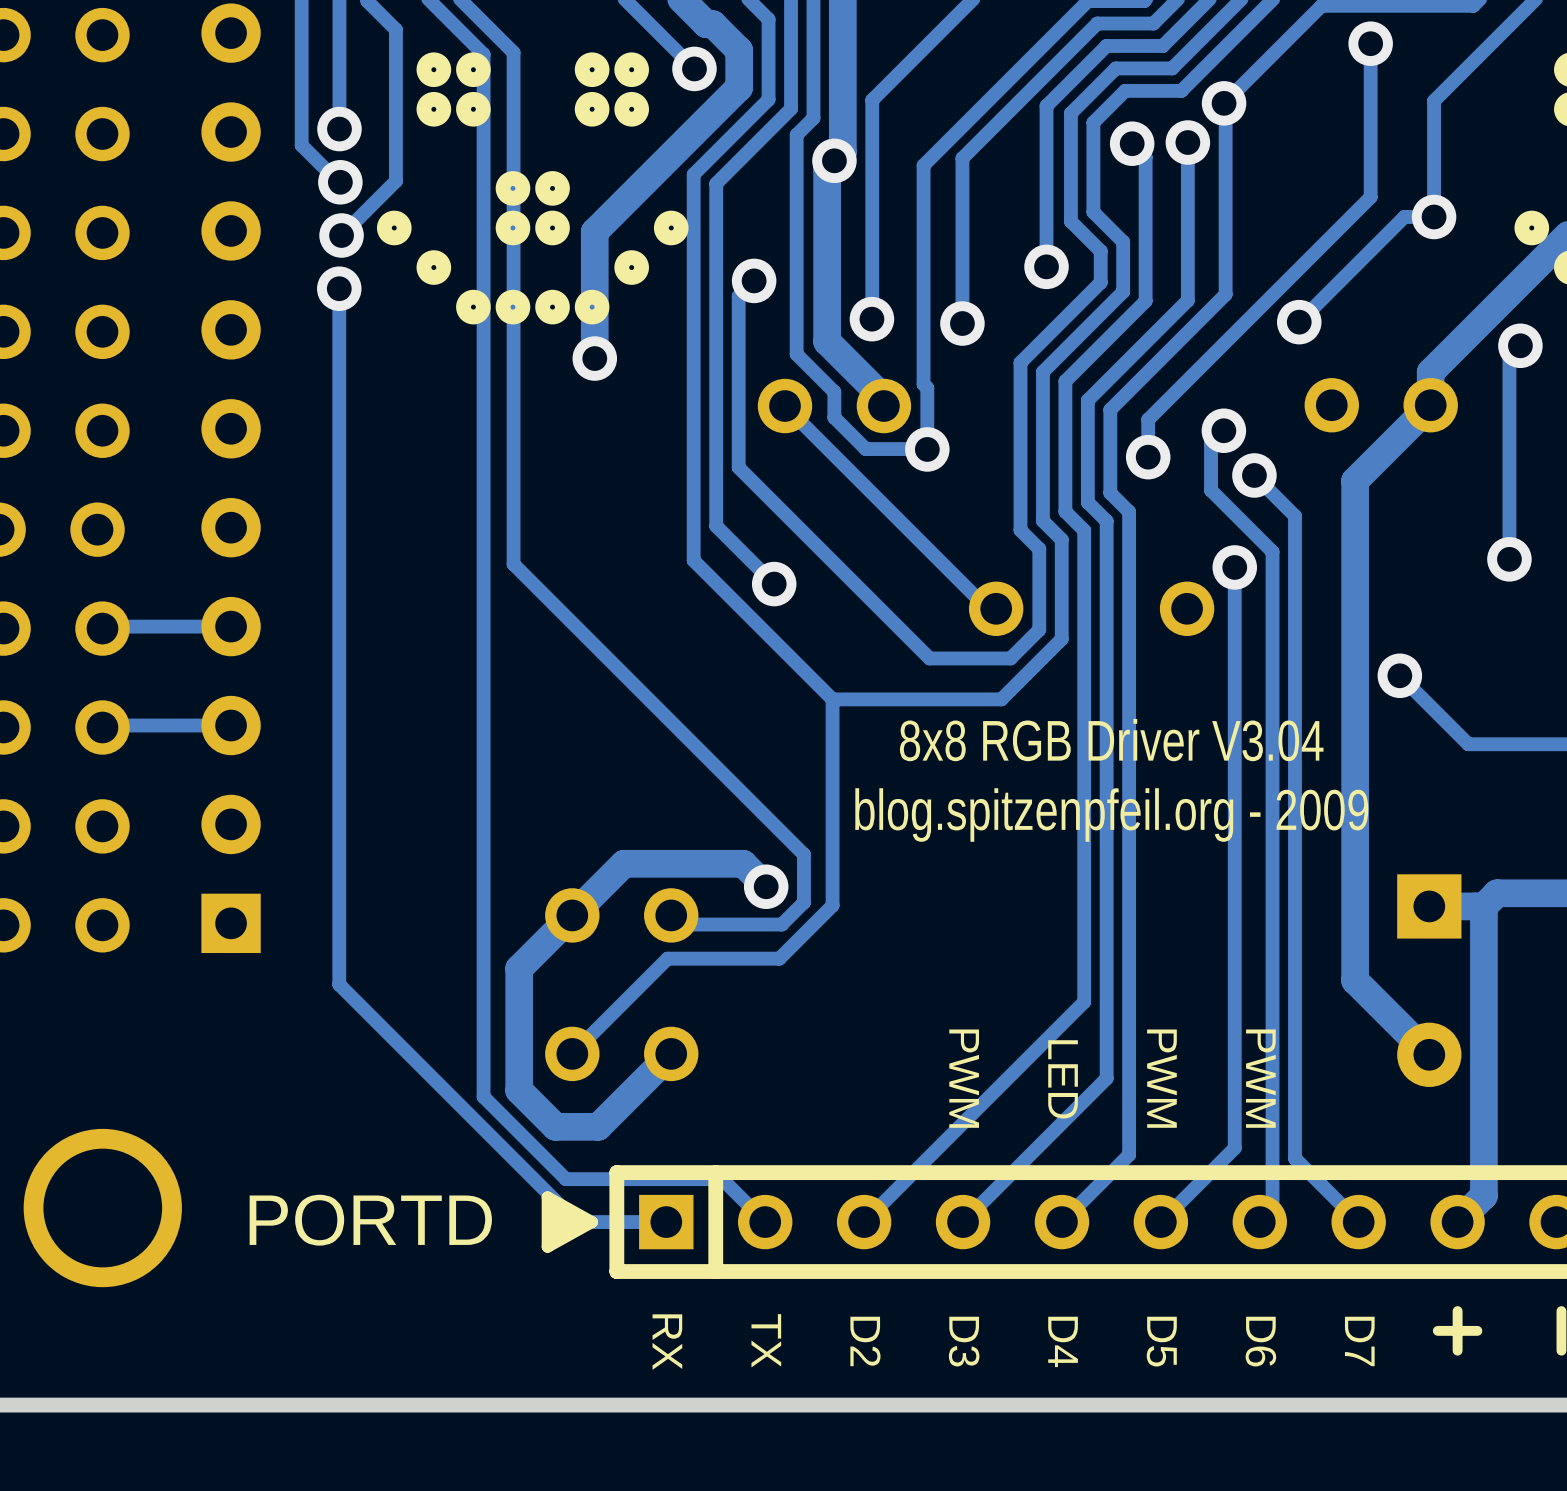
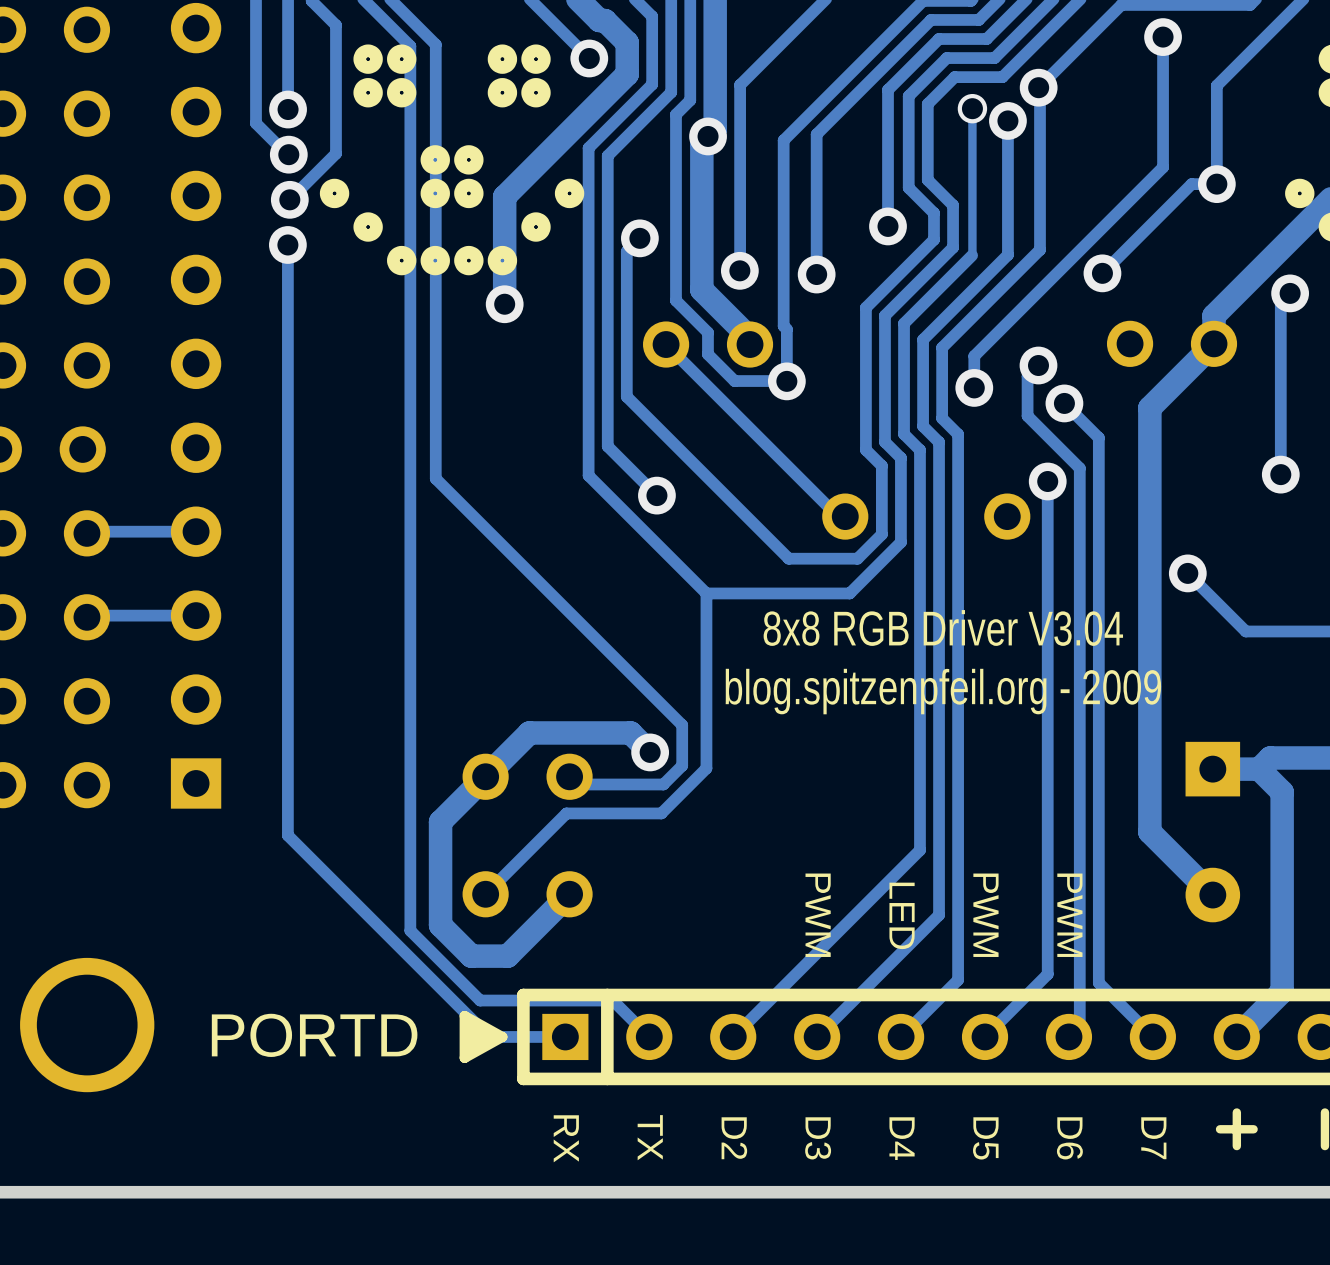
track: (1132, 143) (1145, 157) (1145, 301) -> (972, 108) (972, 255)
via position: (1132, 143) -> (972, 108)
track: (1483, 906) (1483, 1195) -> (1259, 769) (1282, 792) (1282, 991) (1259, 1014)

